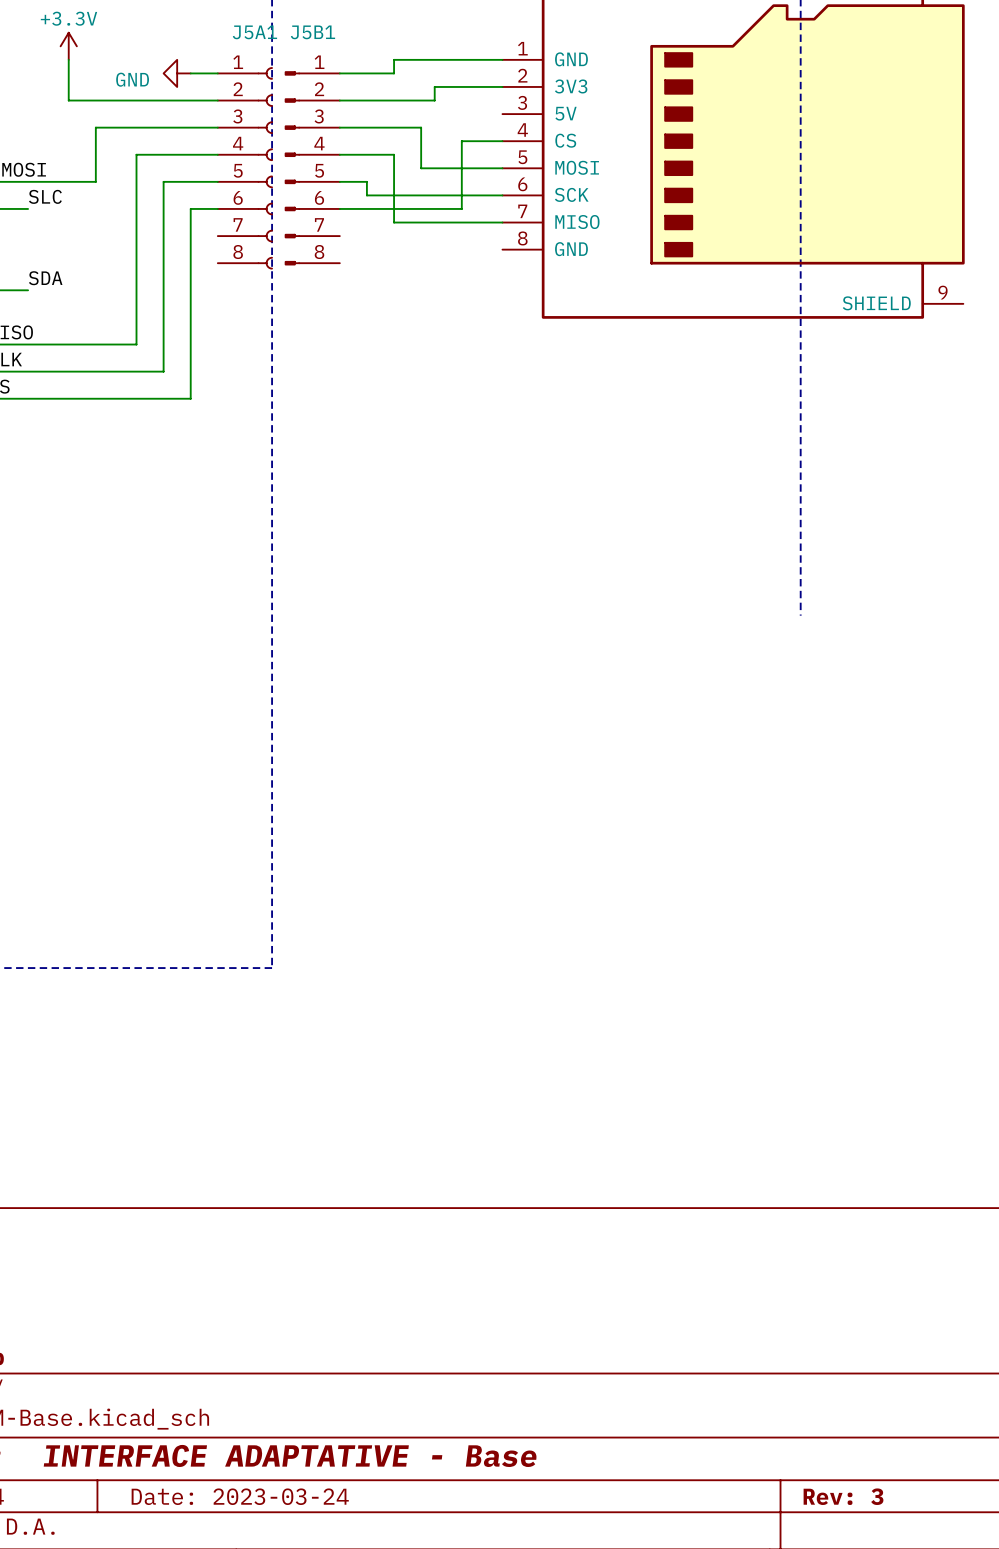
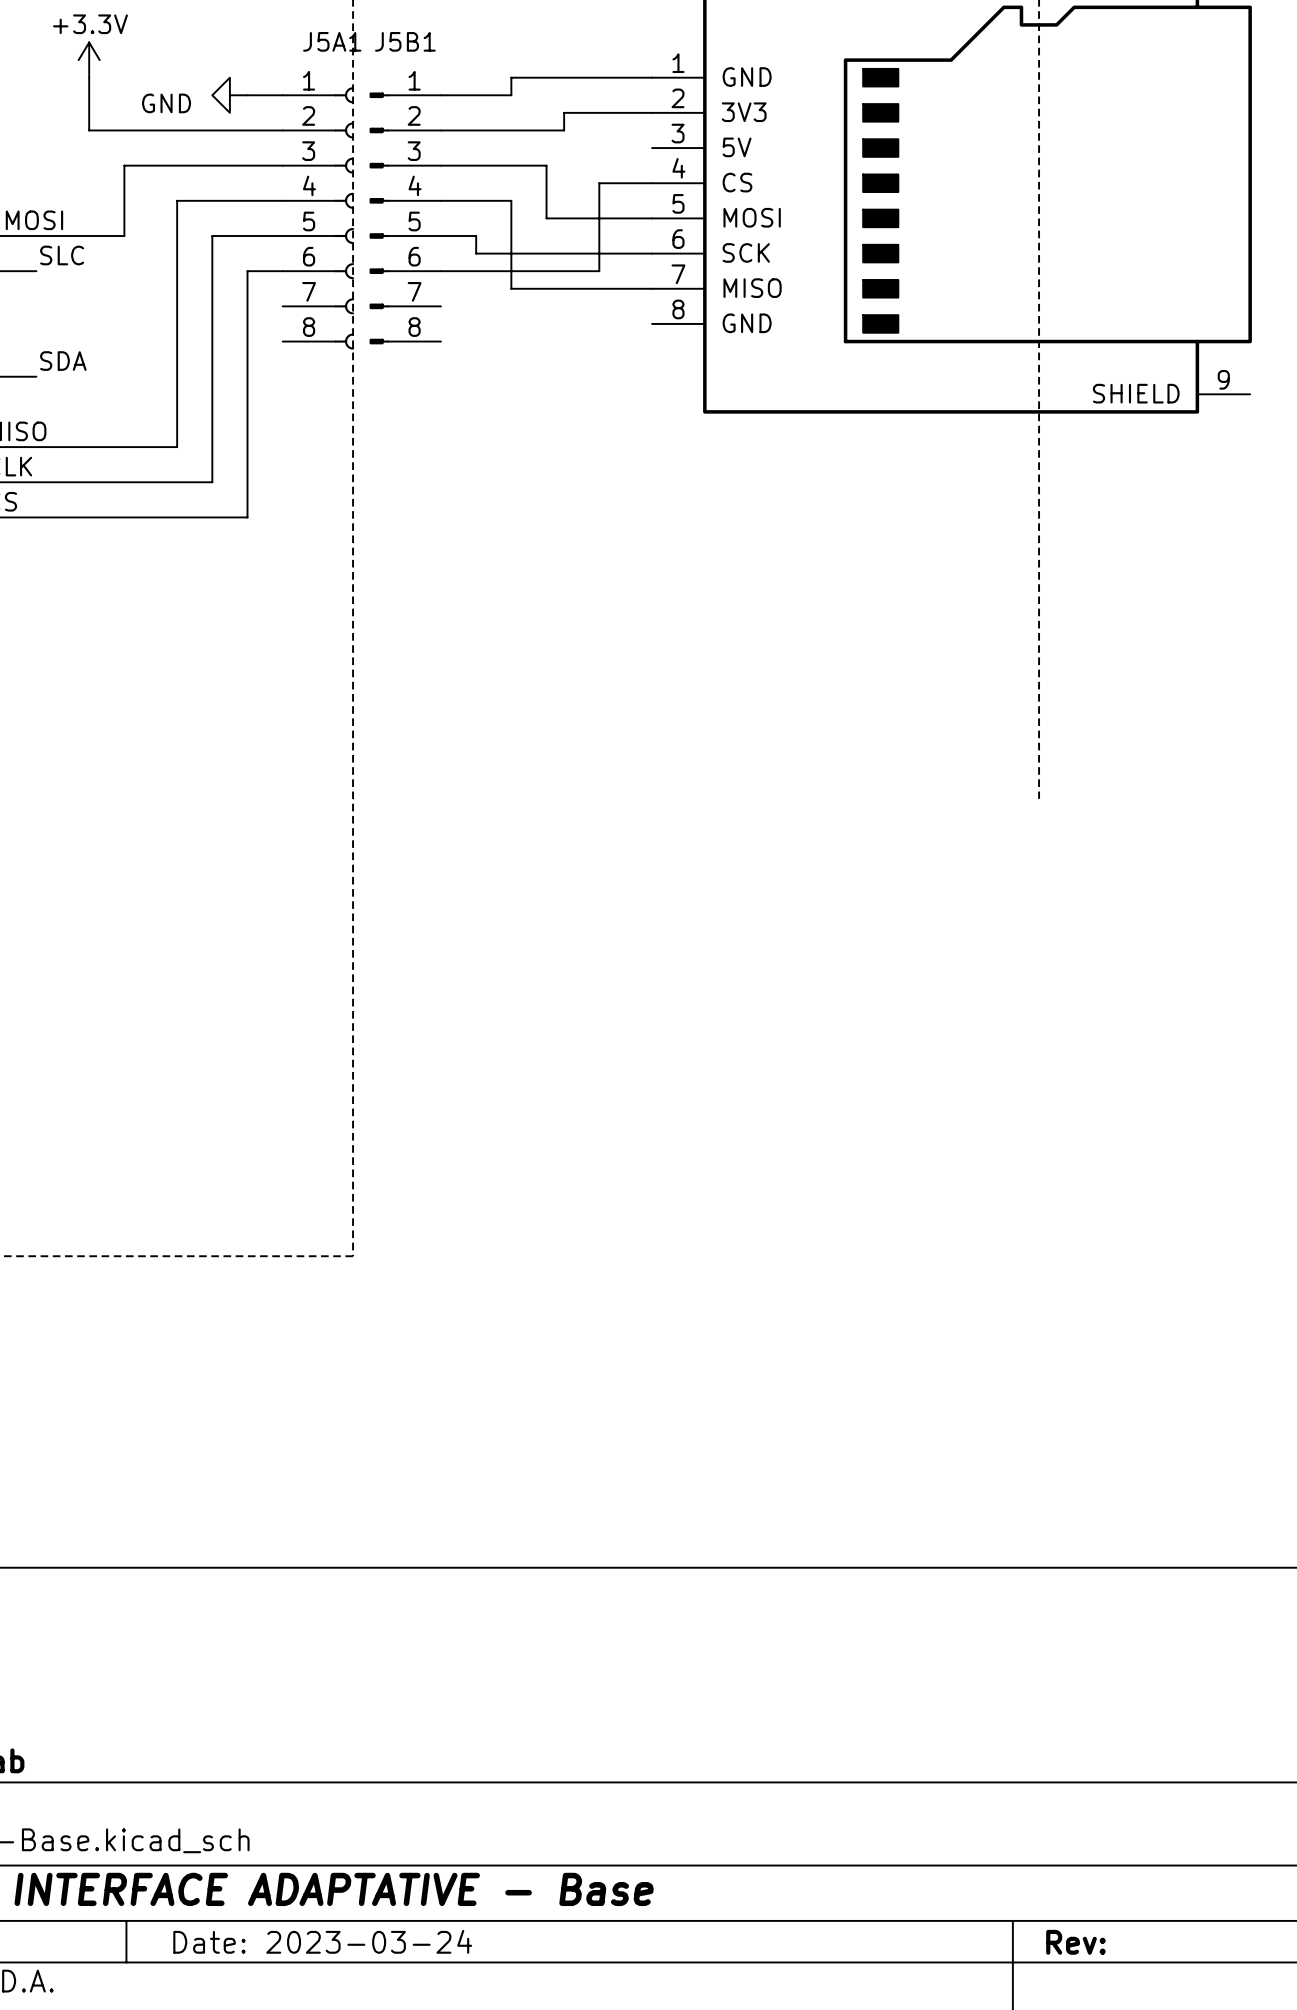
title block: Rev: 3 (843, 1496) -> Rev: (1075, 1942)

